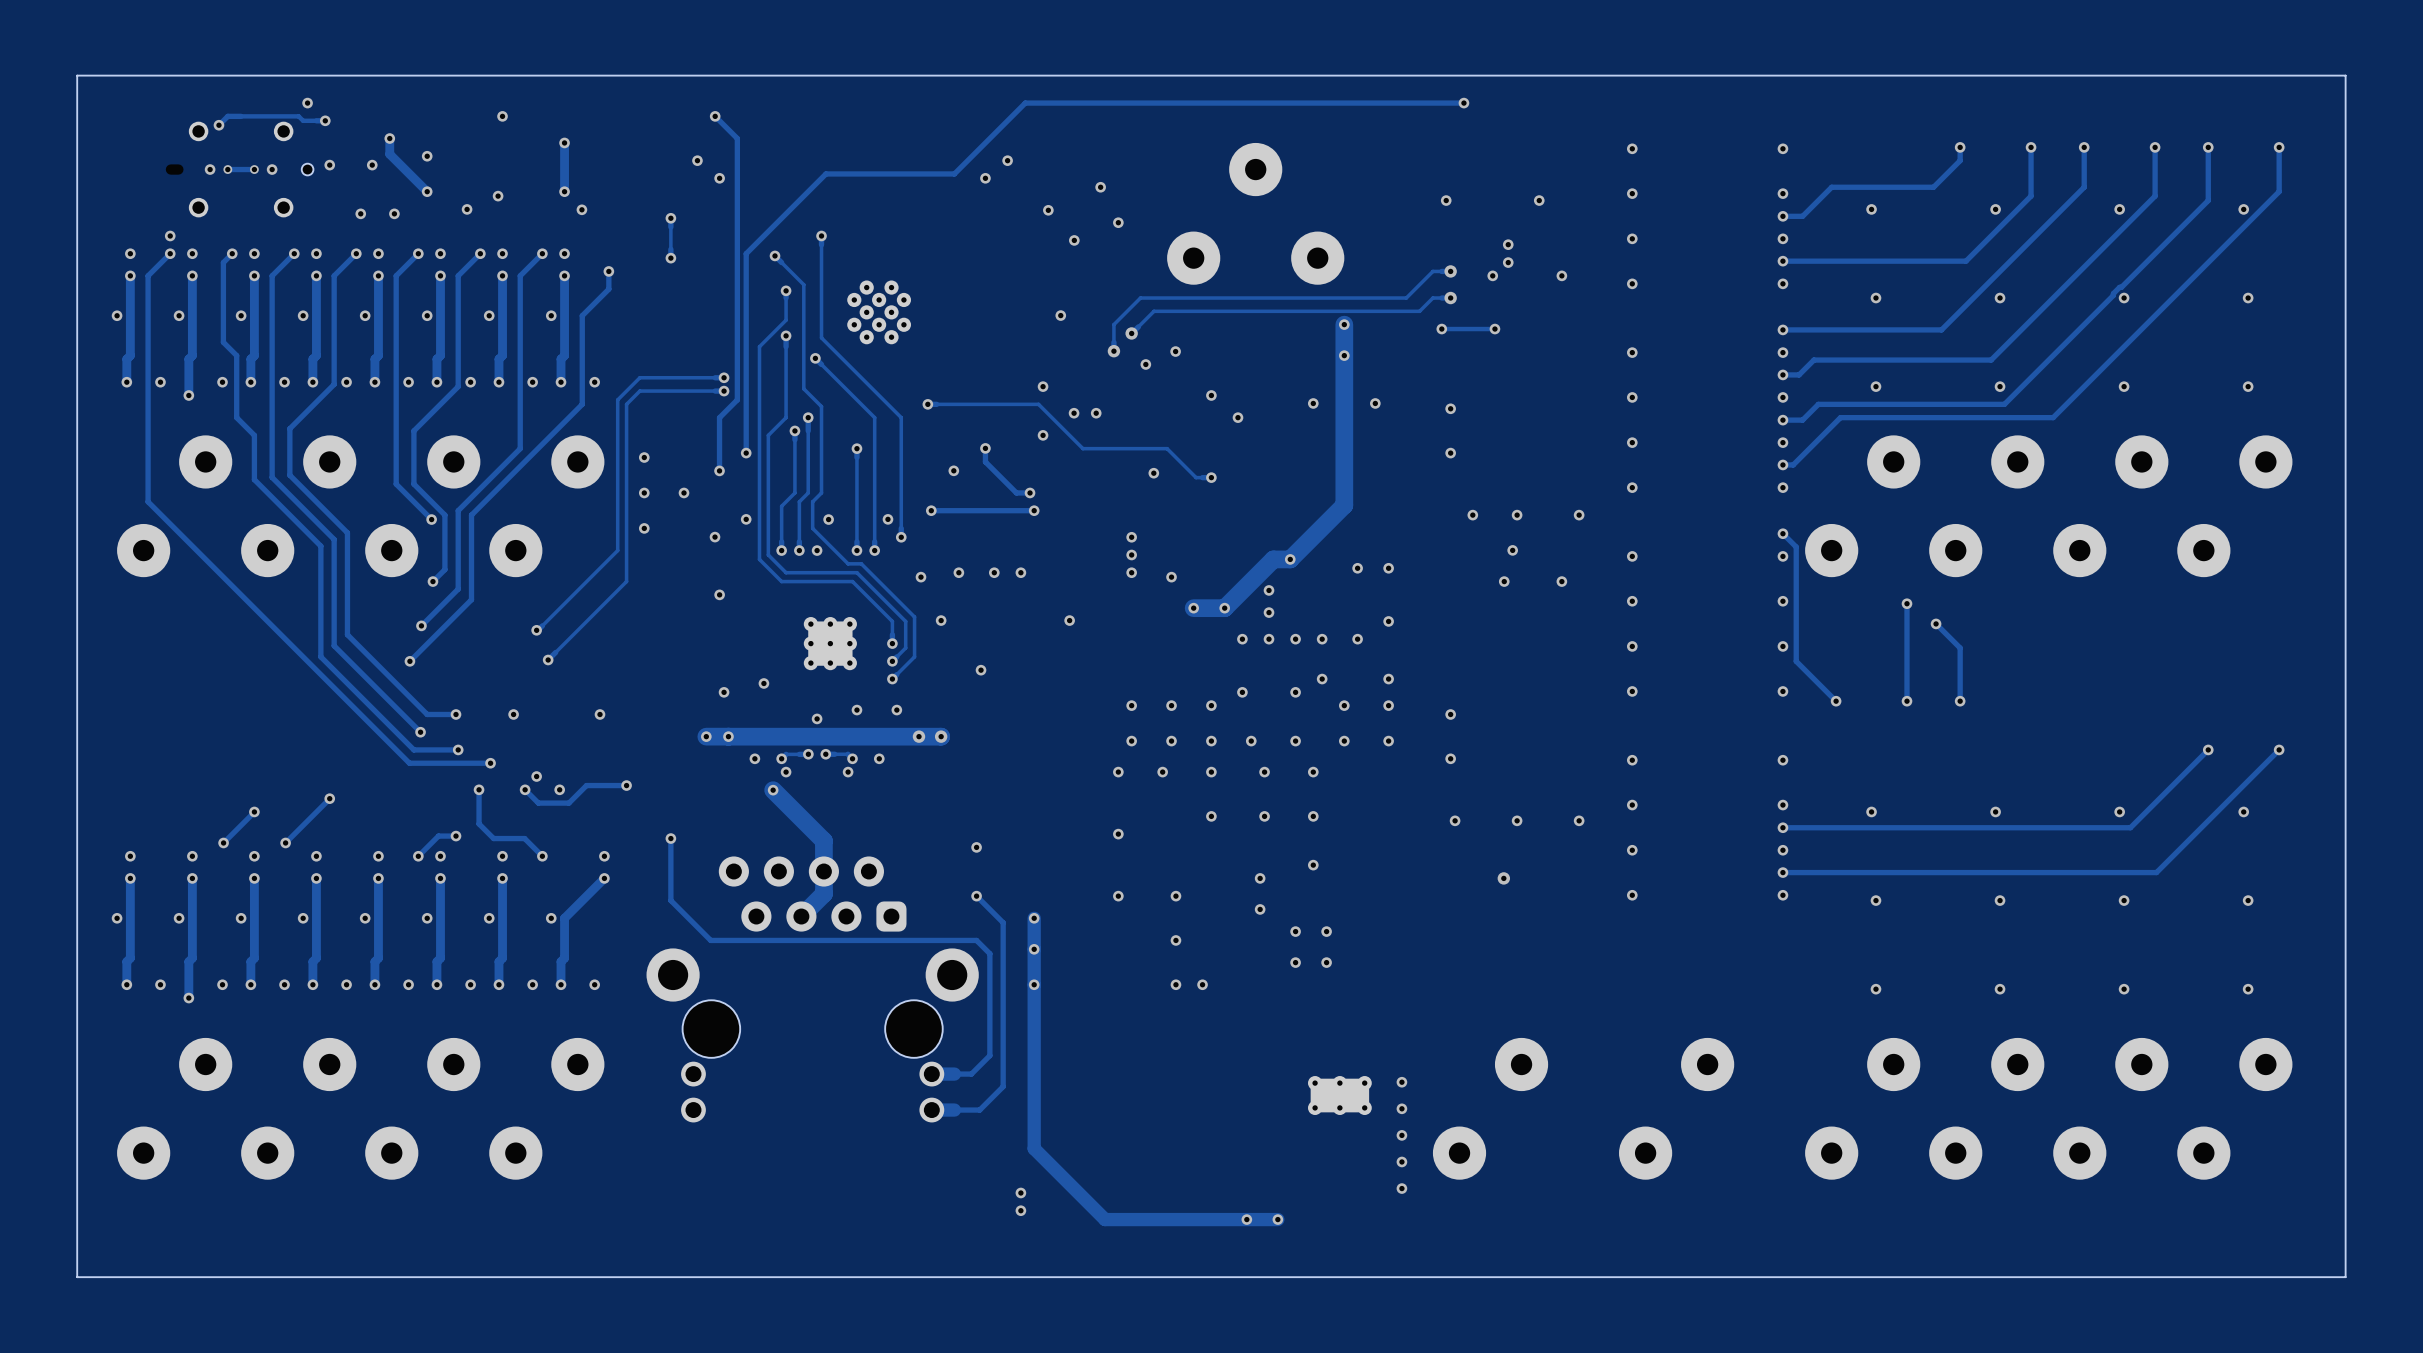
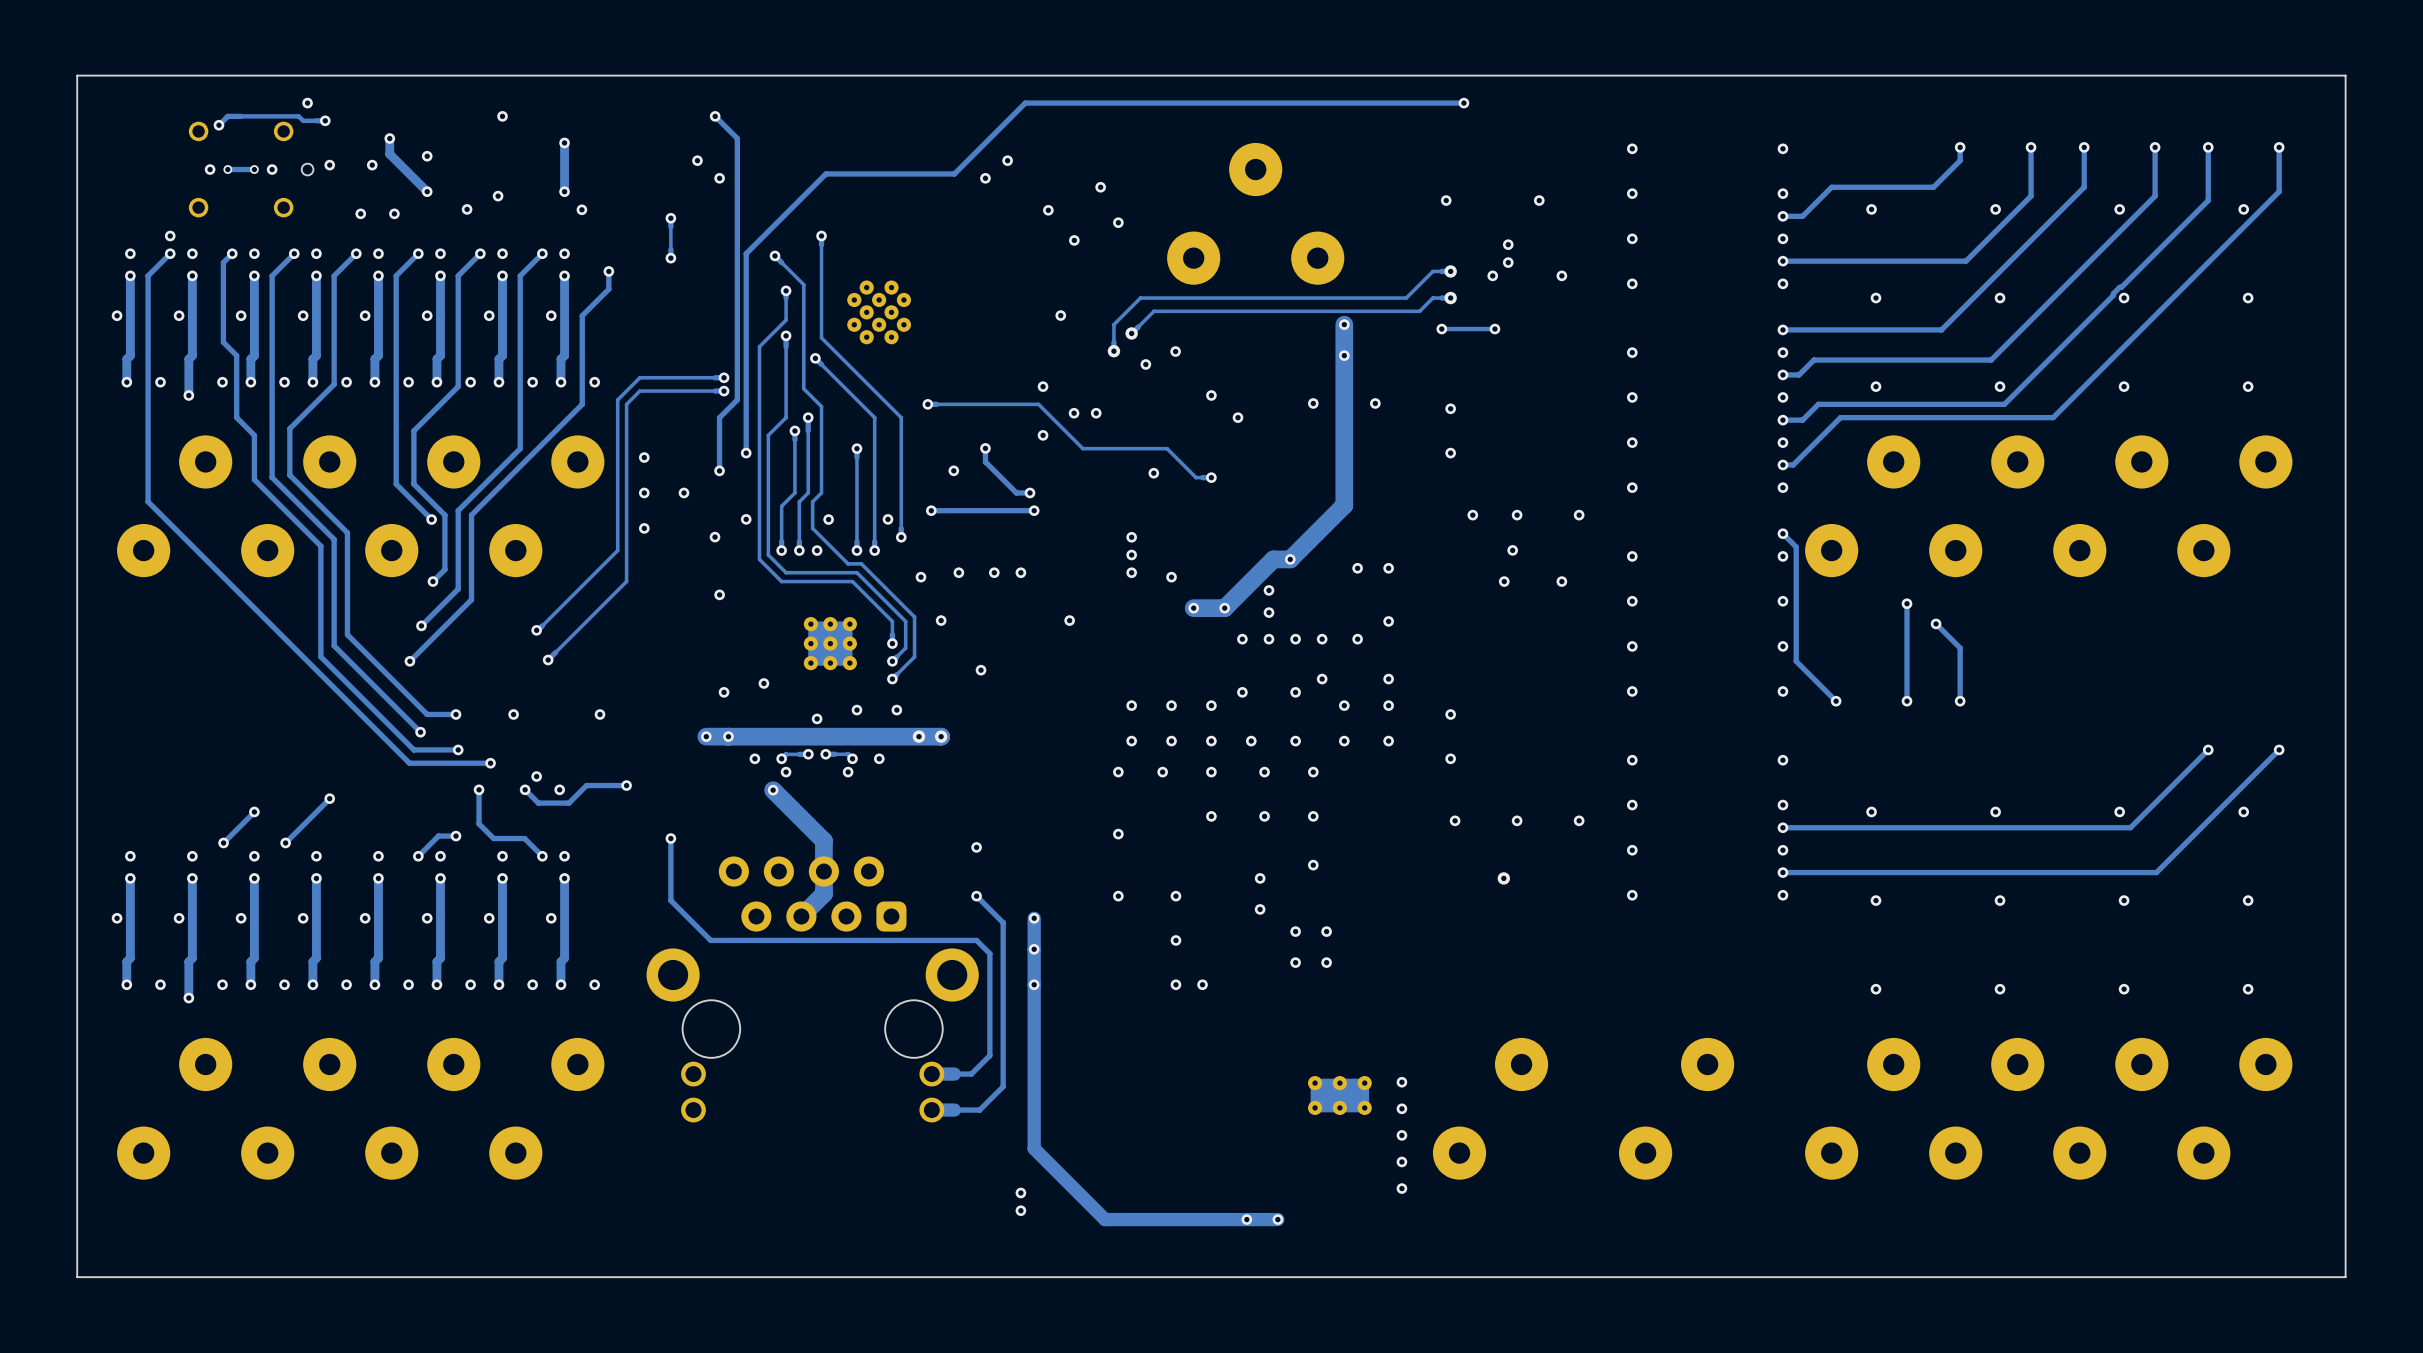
via: none -> (564, 856)
via: (604, 856) -> none
via: none -> (564, 878)
track: (604, 878) (564, 918) -> (564, 878) (564, 918)
via: (604, 878) -> none

